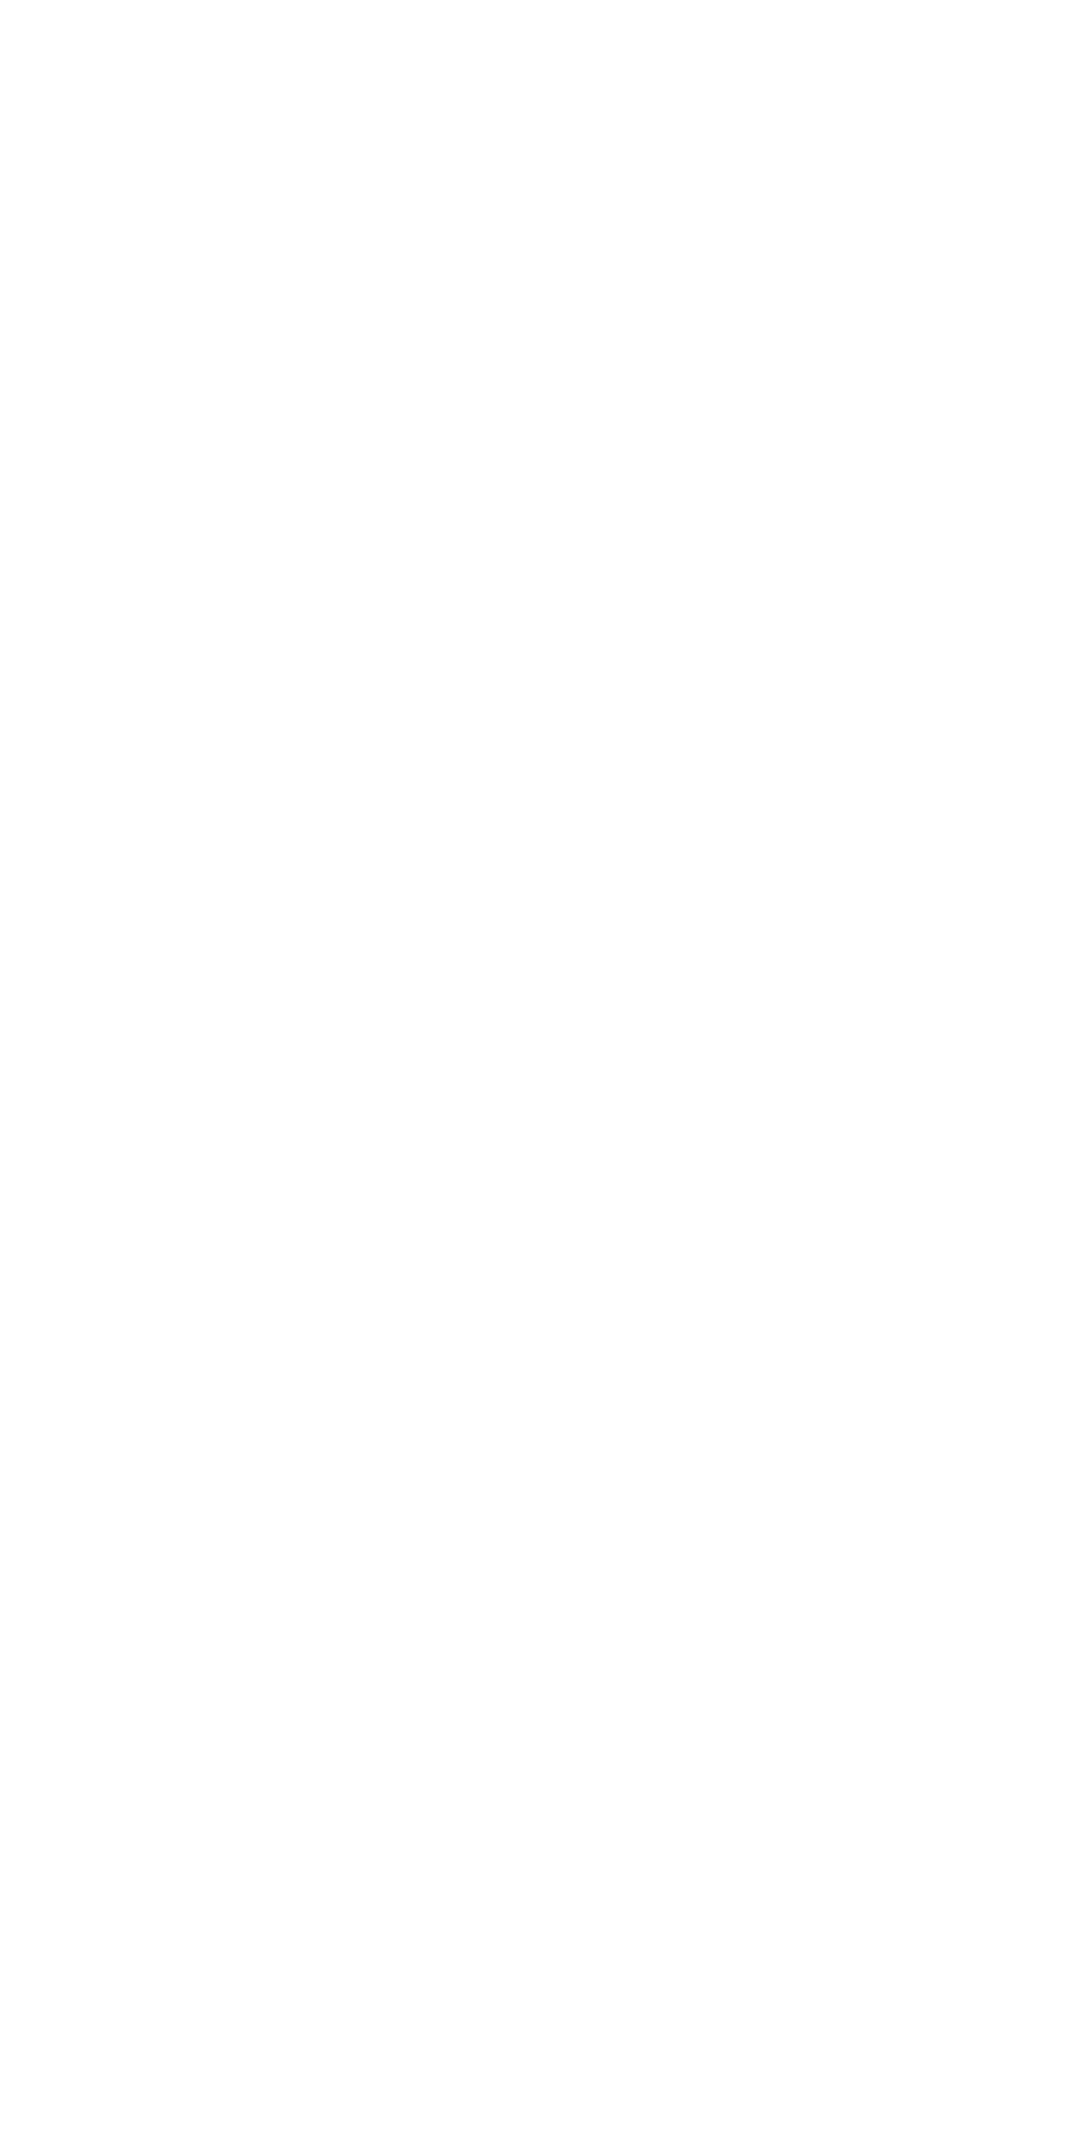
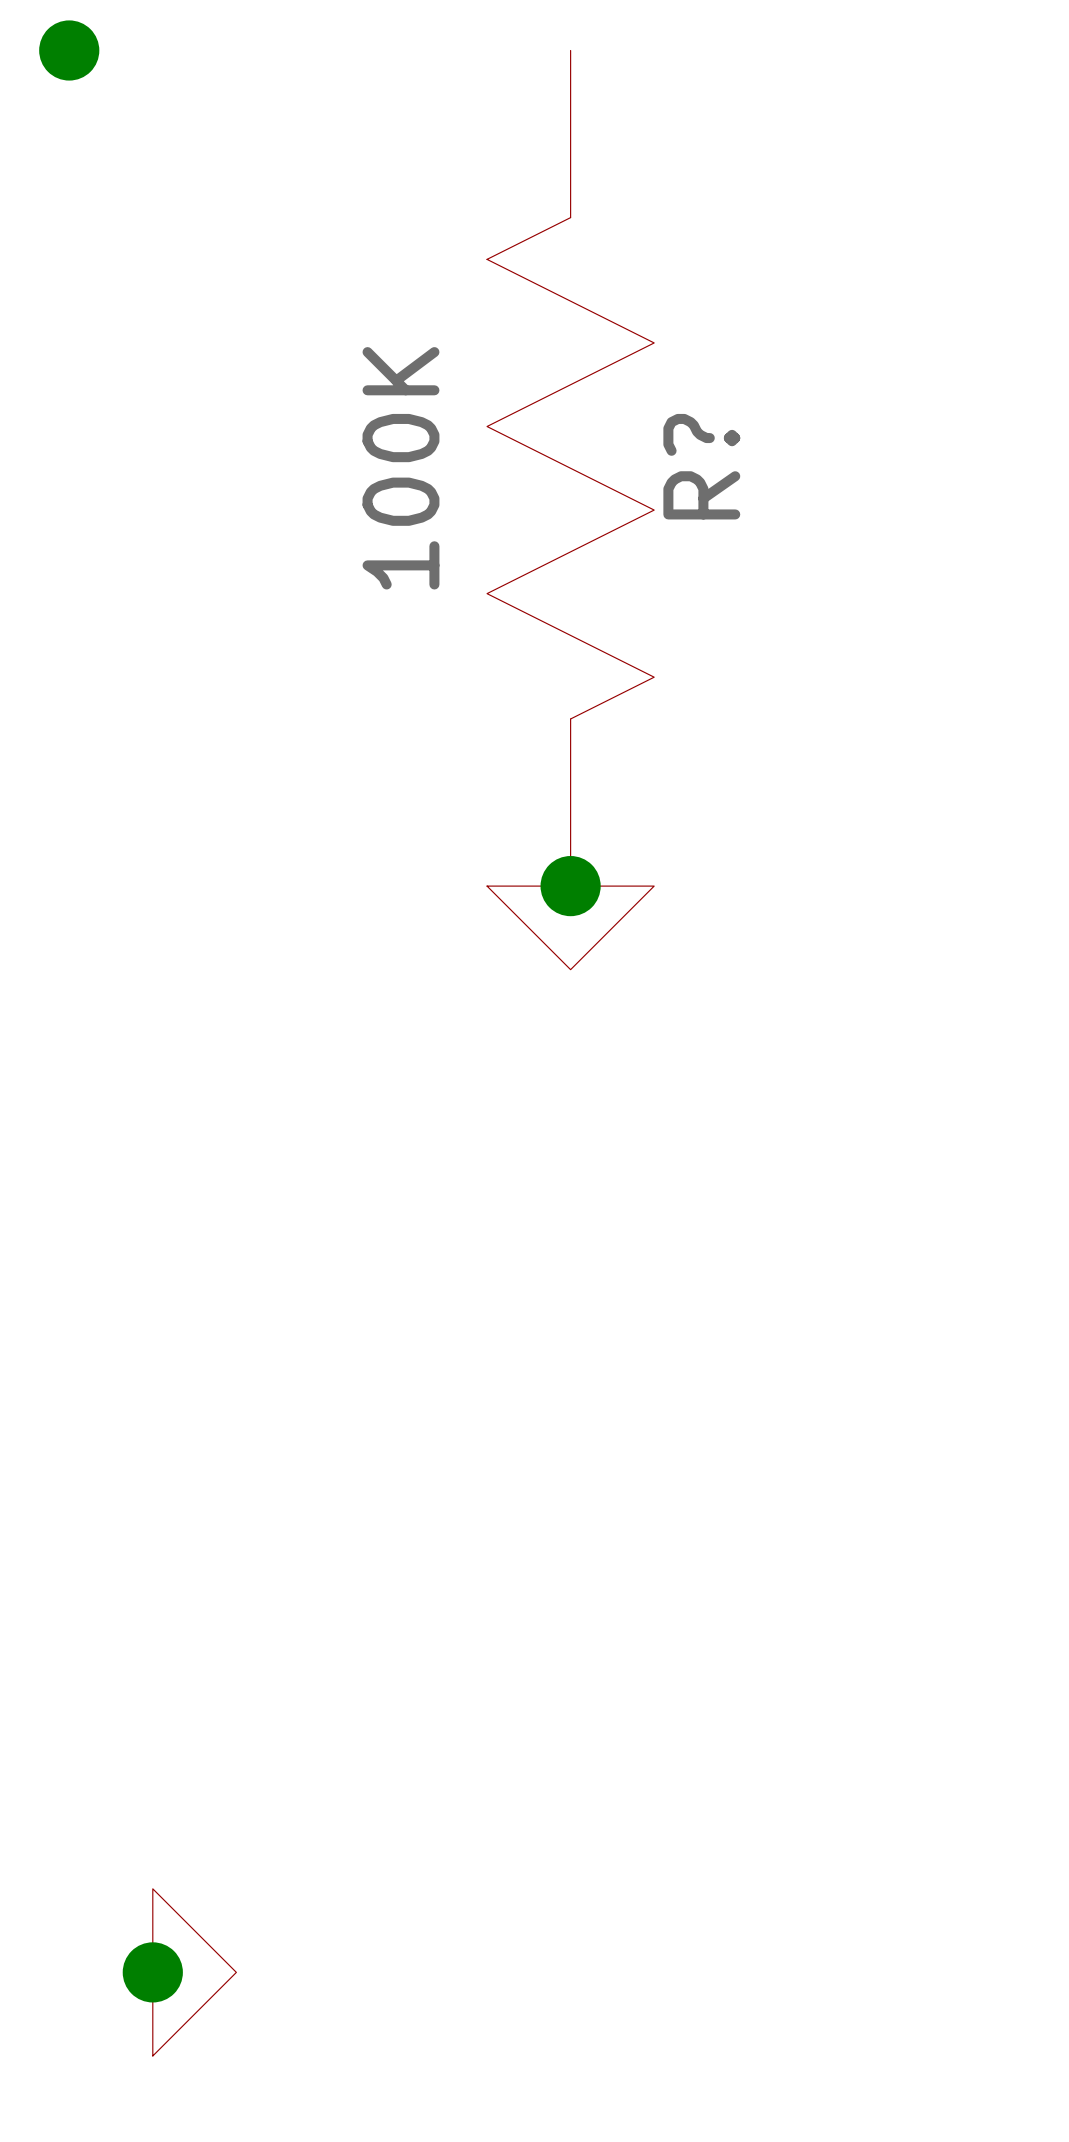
junction: none -> (69, 50)
R?: none -> 100K (570, 468)
junction: none -> (570, 886)
power symbol: none -> (570, 927)
junction: none -> (152, 1972)
power symbol: none -> (194, 1972)

